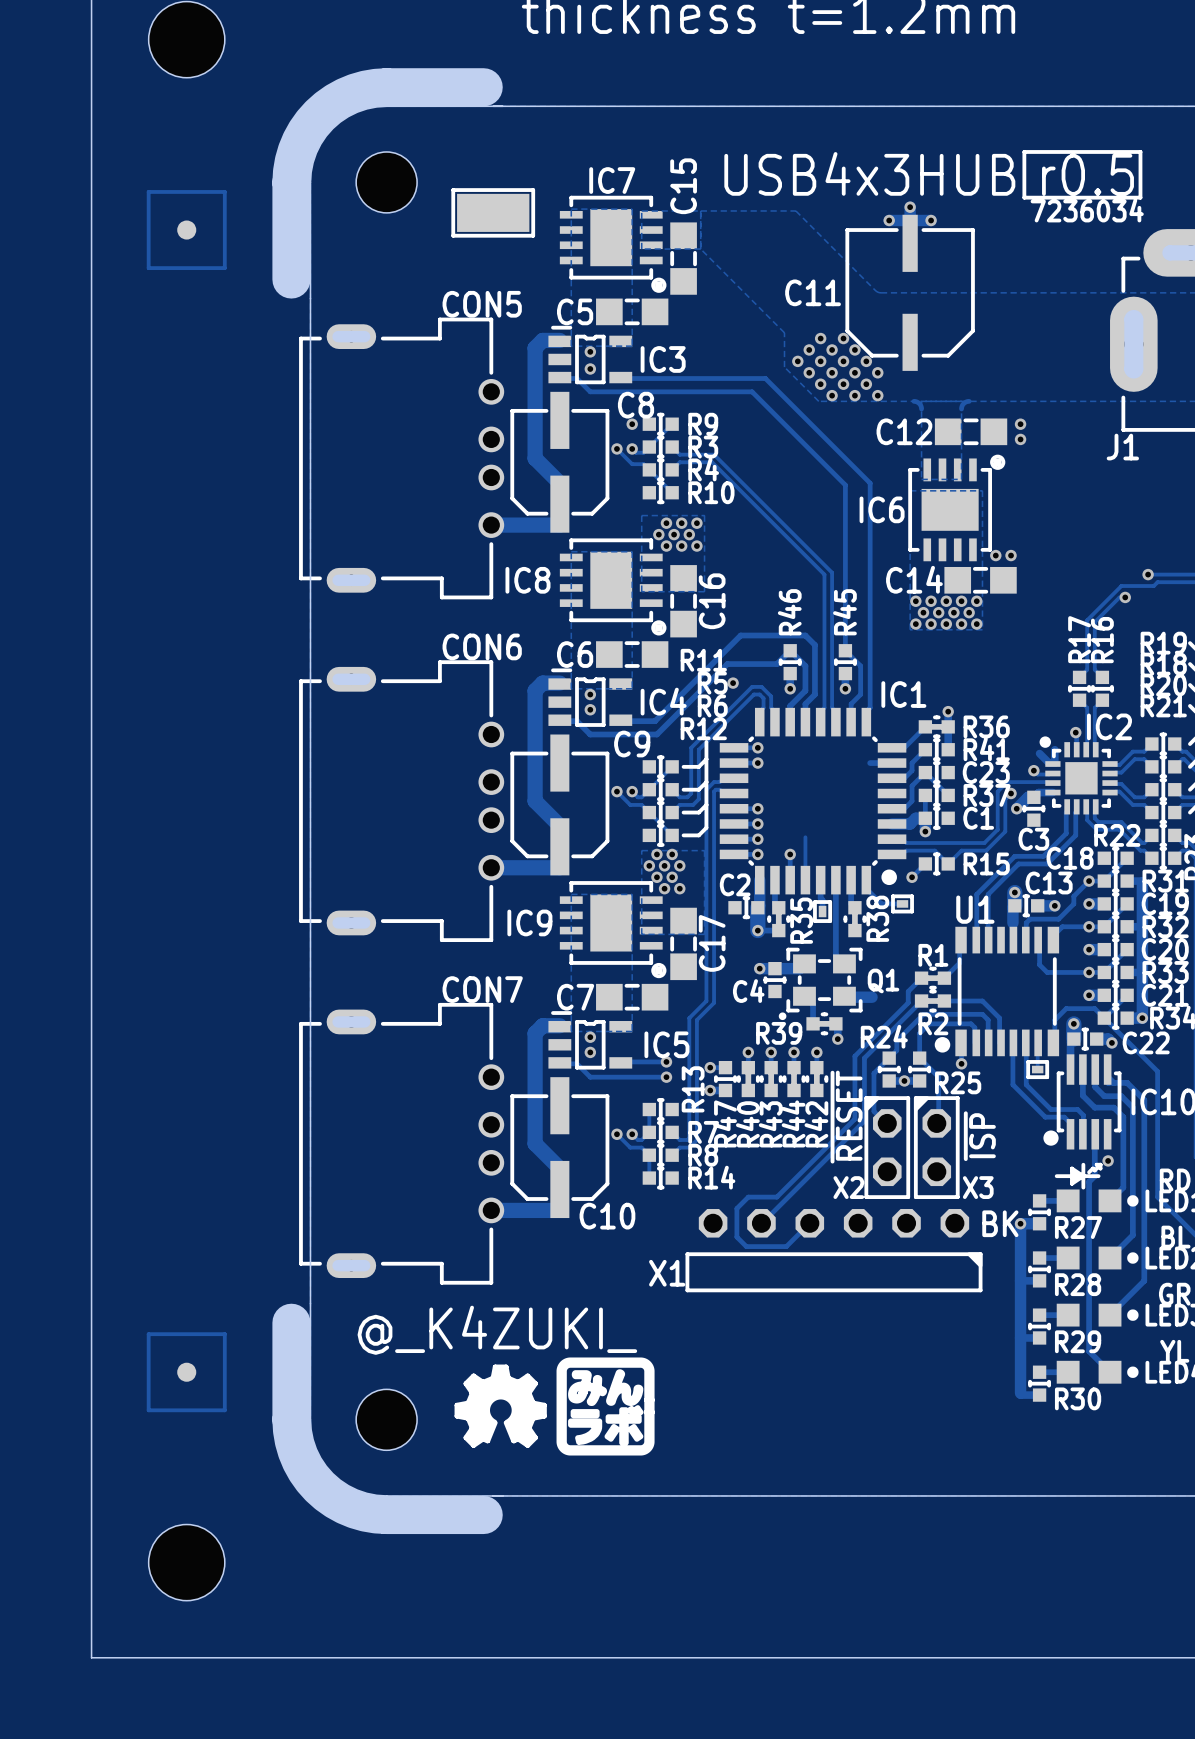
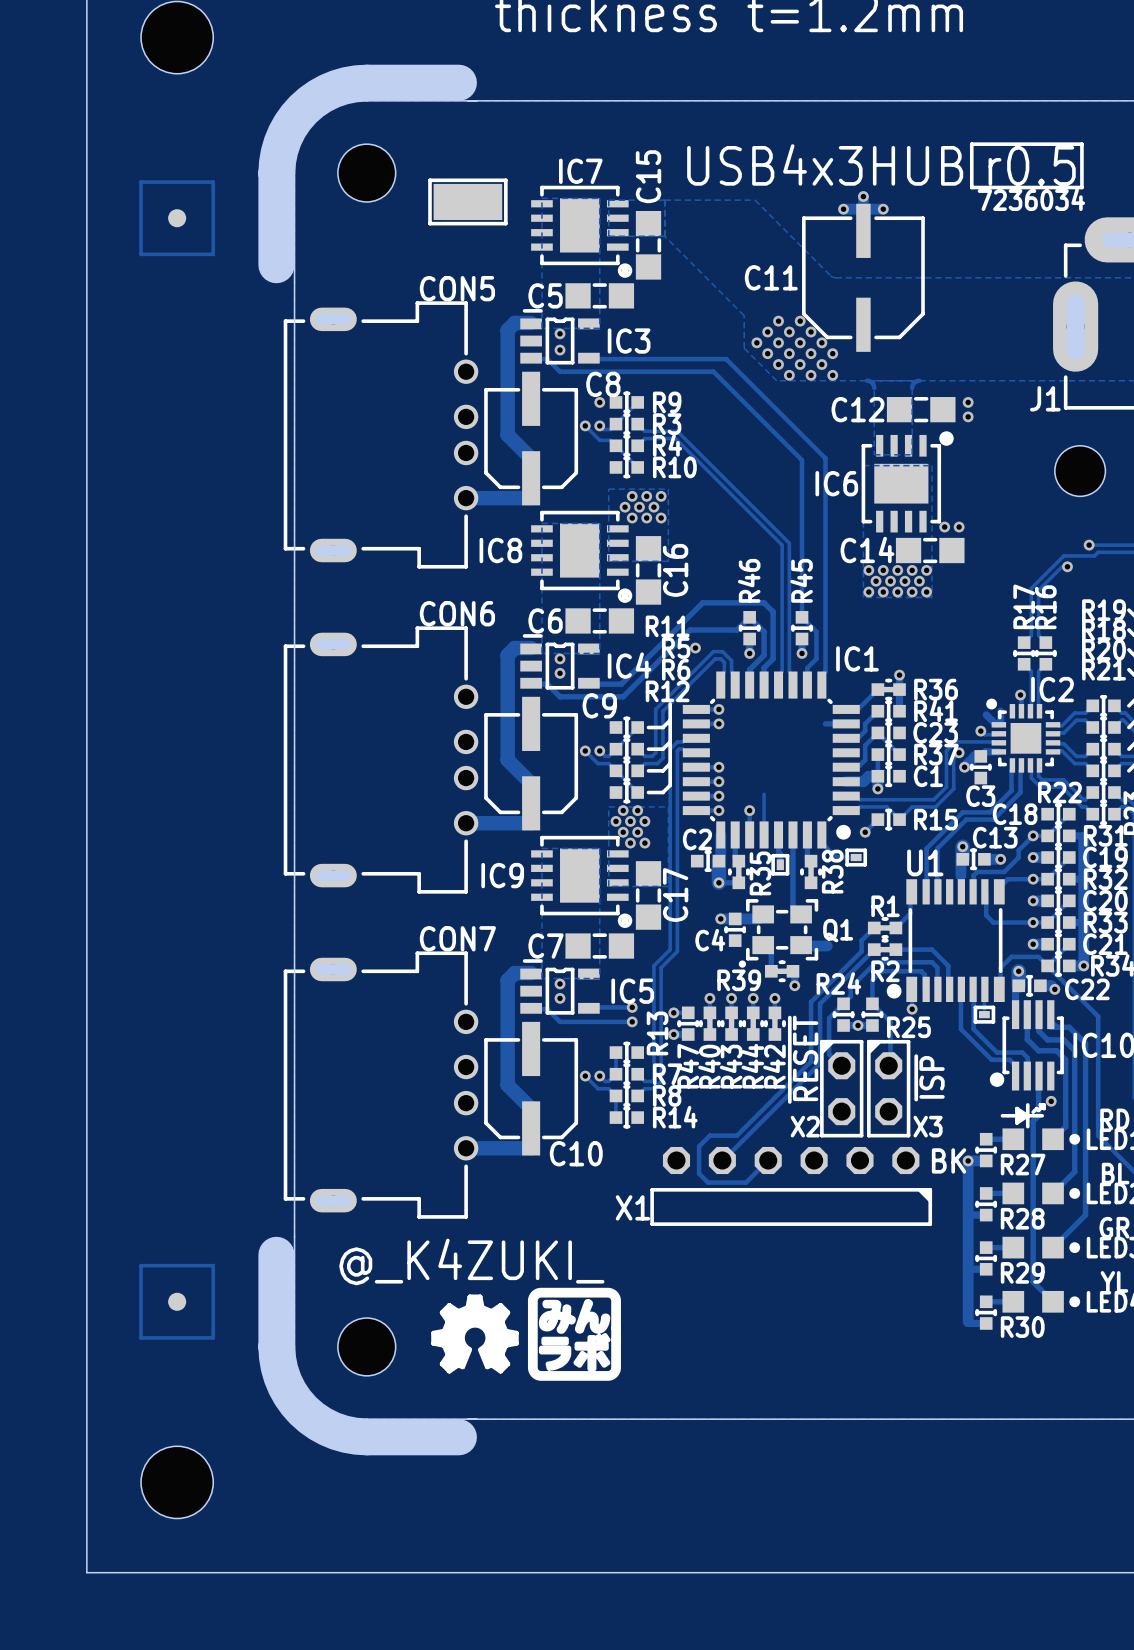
J1 name position: J1 (1122, 447) -> J1 (1045, 398)
hole: none -> (1080, 471)

